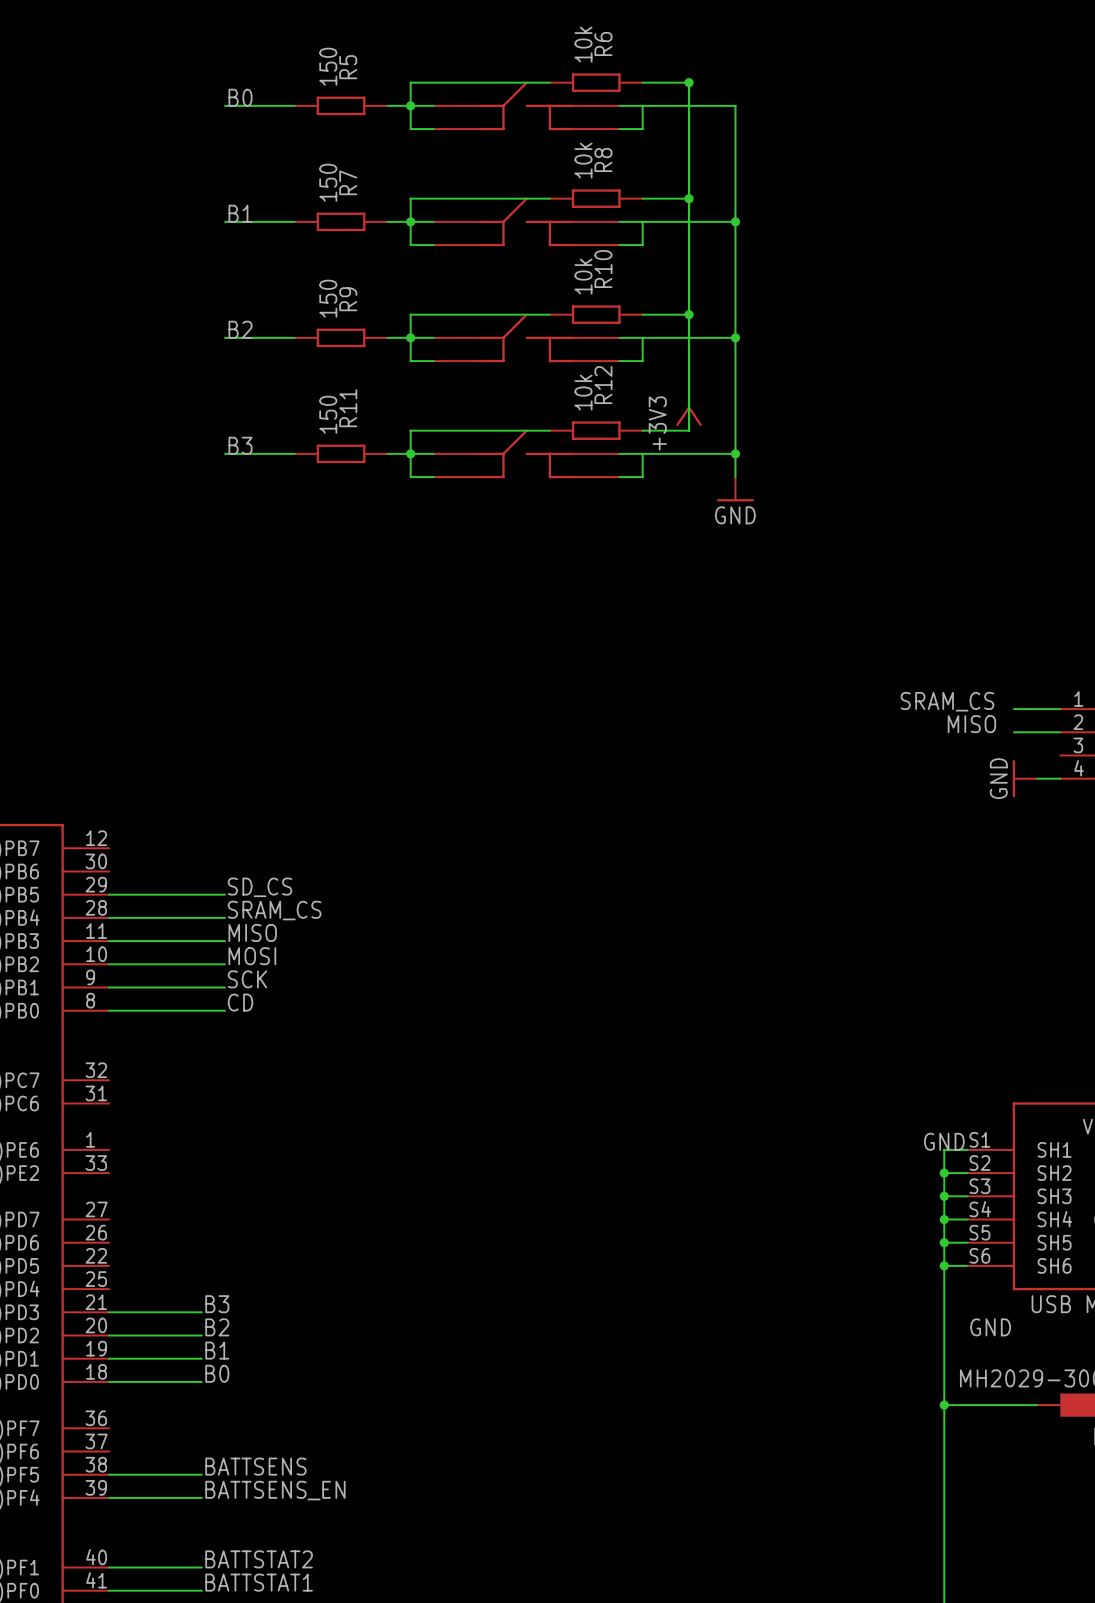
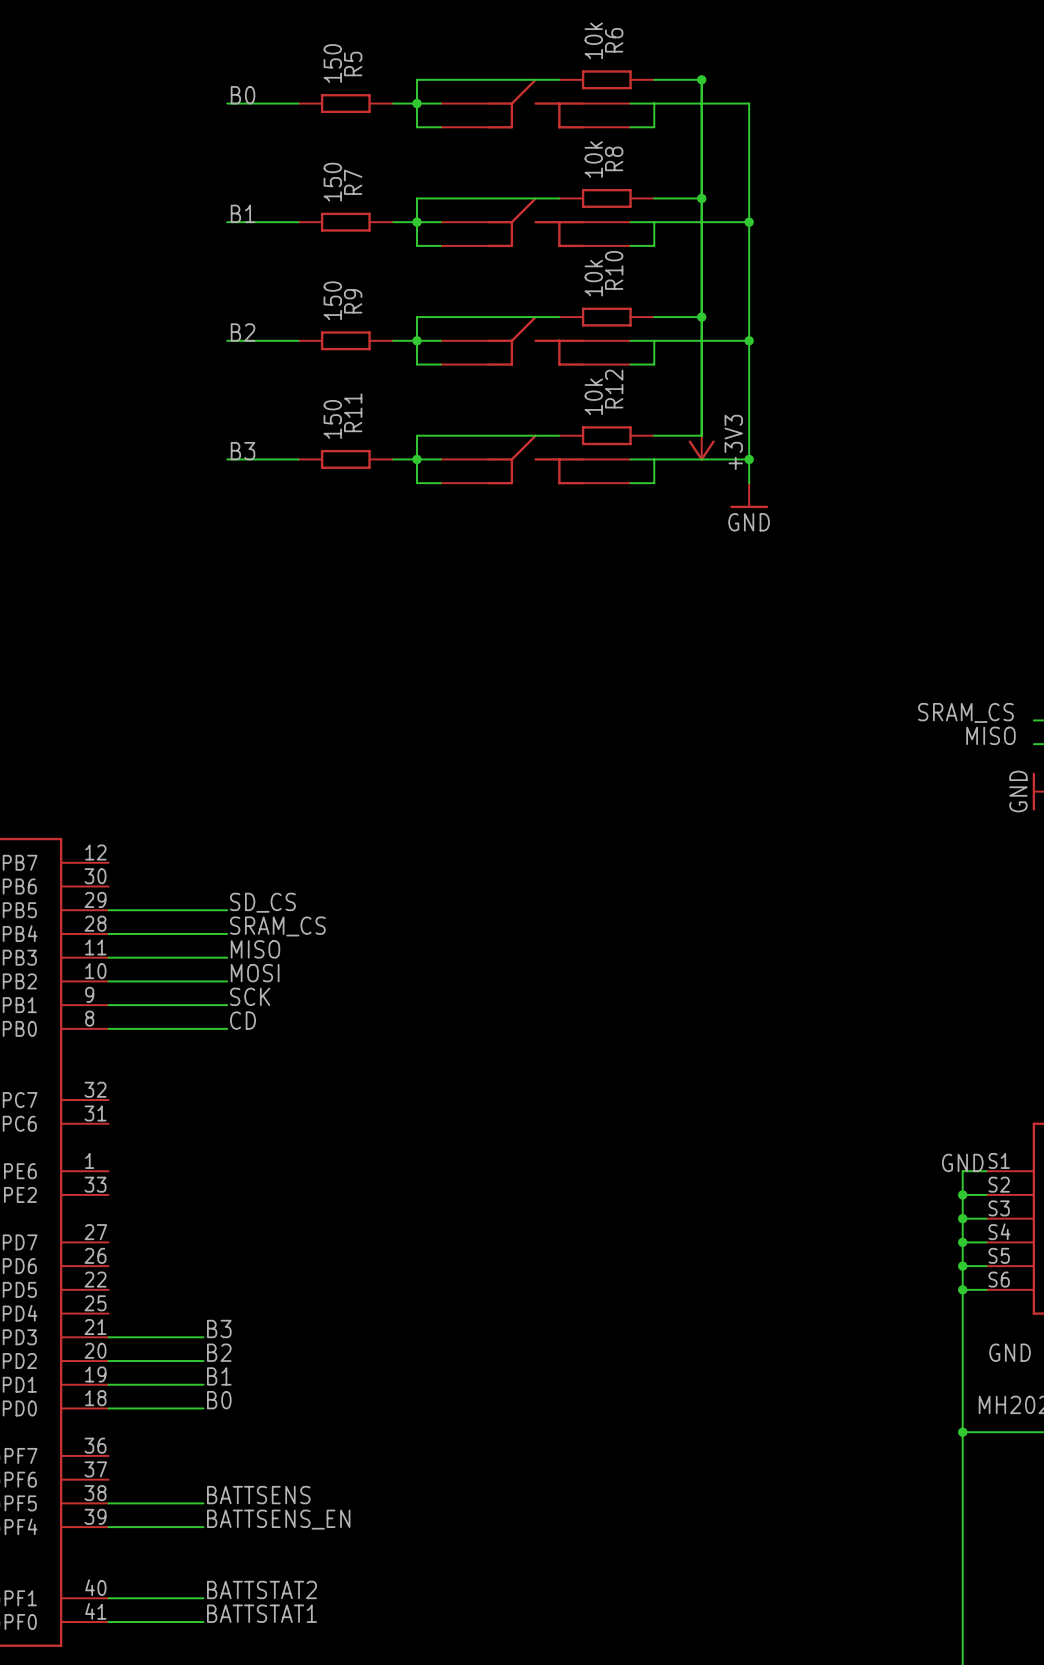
power symbol rotation: 0° (689, 416) -> 180° (701, 450)
power symbol position: +3V3 (689, 418) -> +3V3 (701, 448)

